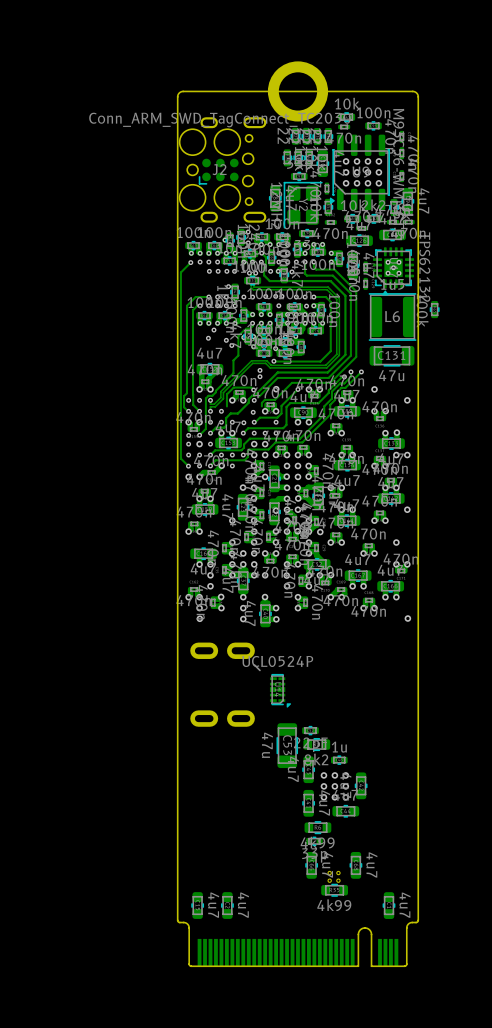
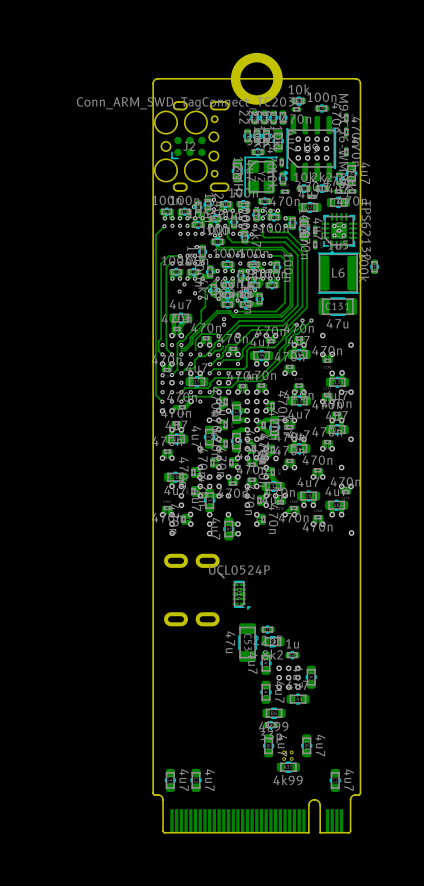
track: none -> (222, 346) (220, 350) (215, 350) (209, 354)
track: none -> (225, 350) (220, 358) (209, 363)
via: none -> (200, 354)
via: none -> (209, 354)
via: (232, 422) -> none

